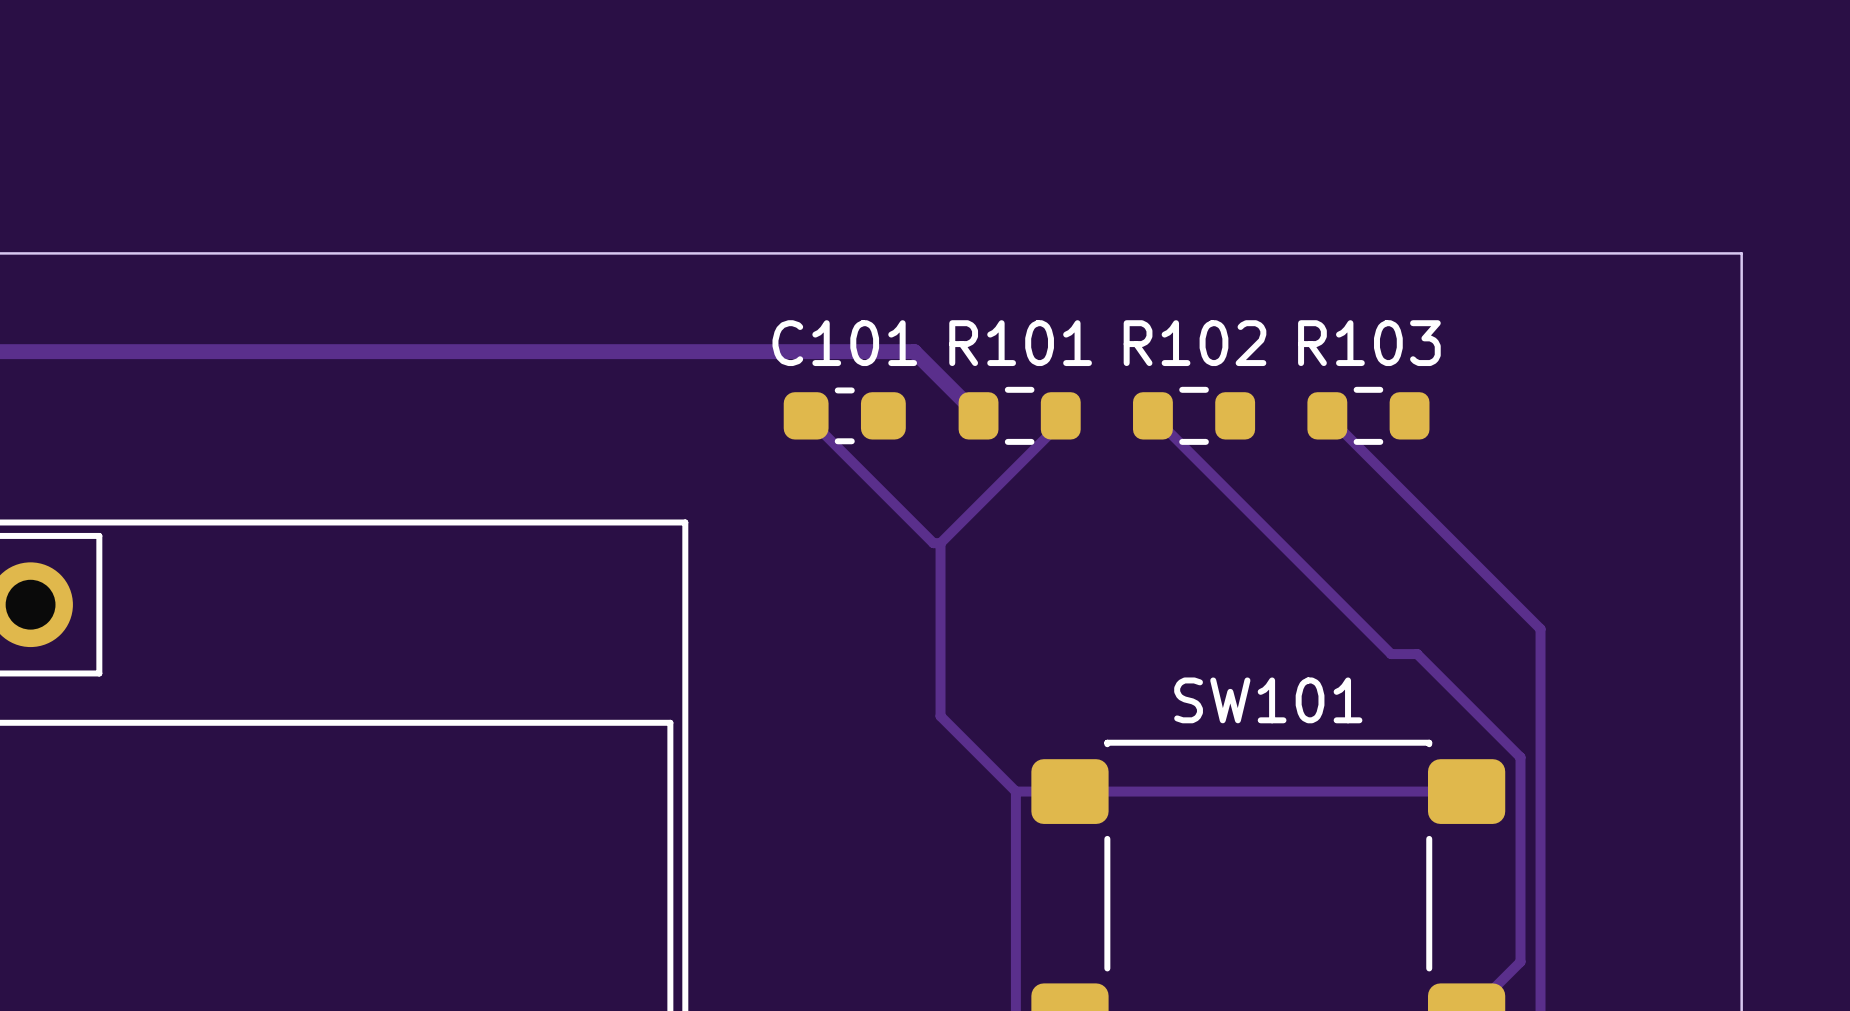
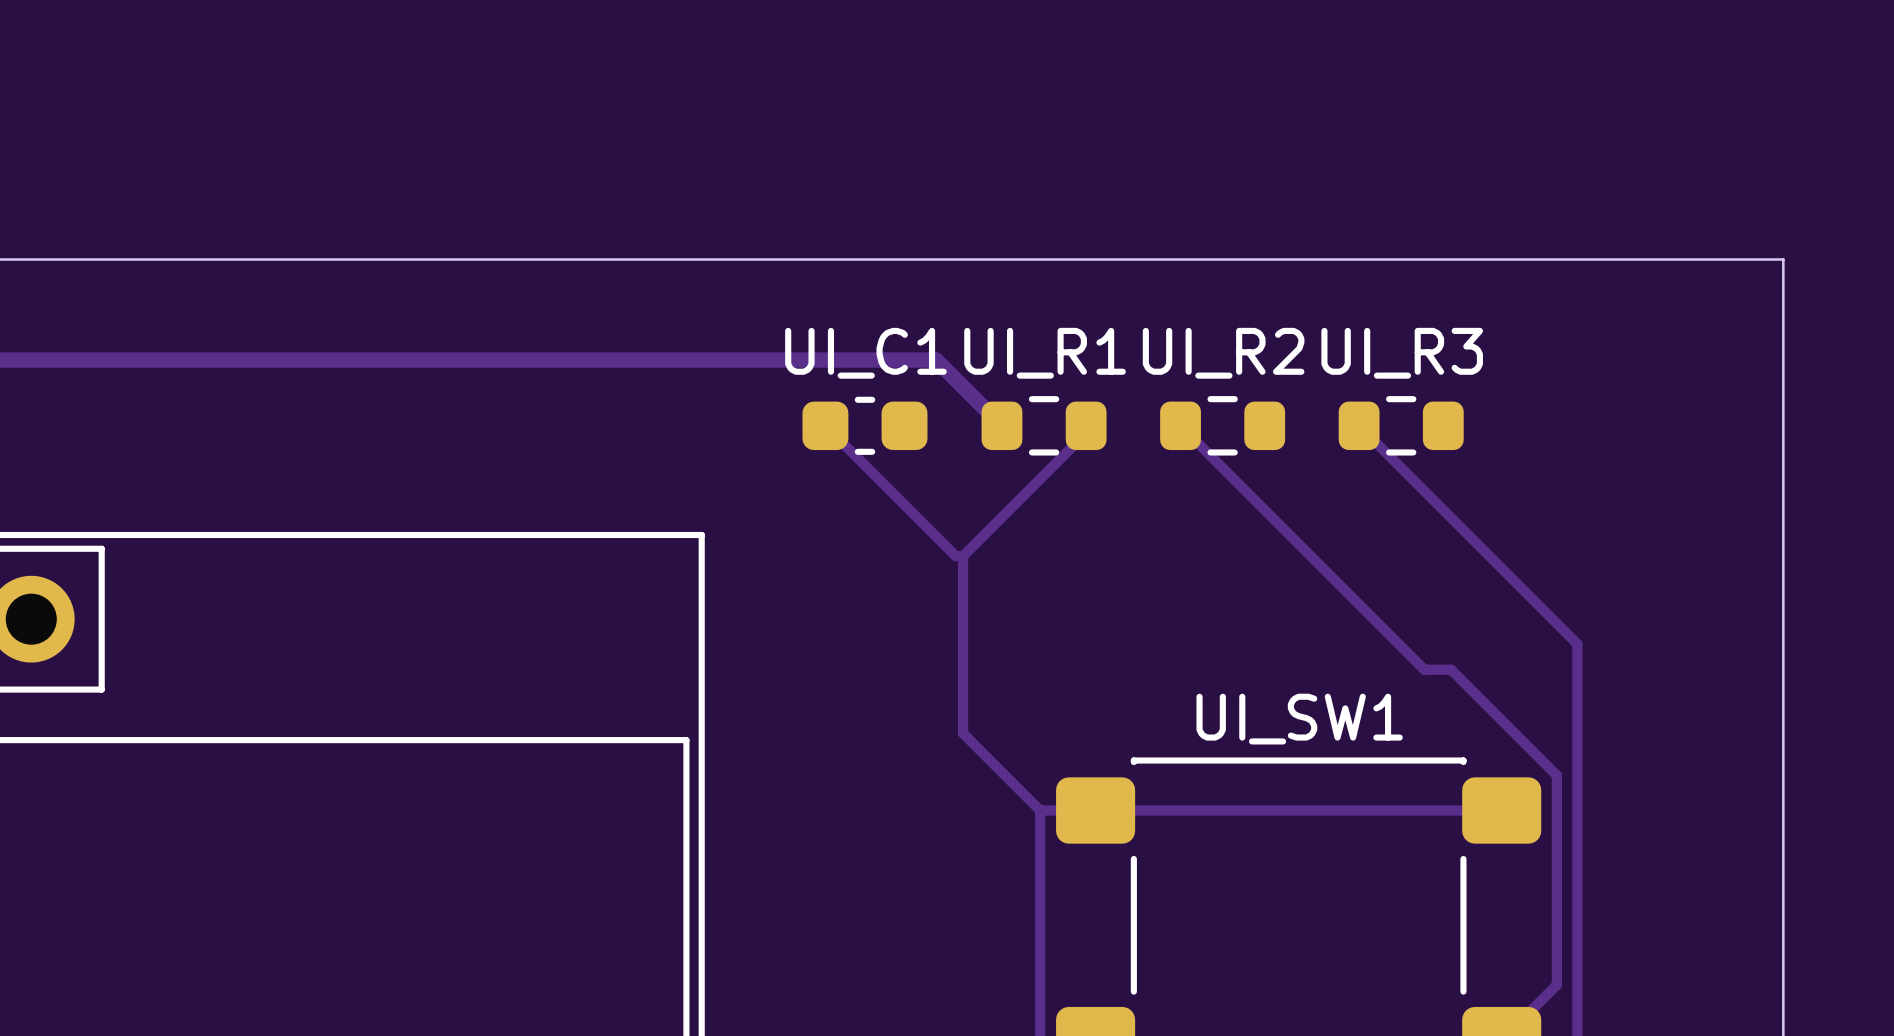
C101 name: C101 (844, 343) -> UI_C1 (865, 353)
R101 name: R101 (1020, 343) -> UI_R1 (1045, 353)
R102 name: R102 (1195, 343) -> UI_R2 (1223, 353)
R103 name: R103 (1369, 343) -> UI_R3 (1402, 353)
SW101 name: SW101 (1268, 700) -> UI_SW1 (1299, 719)

